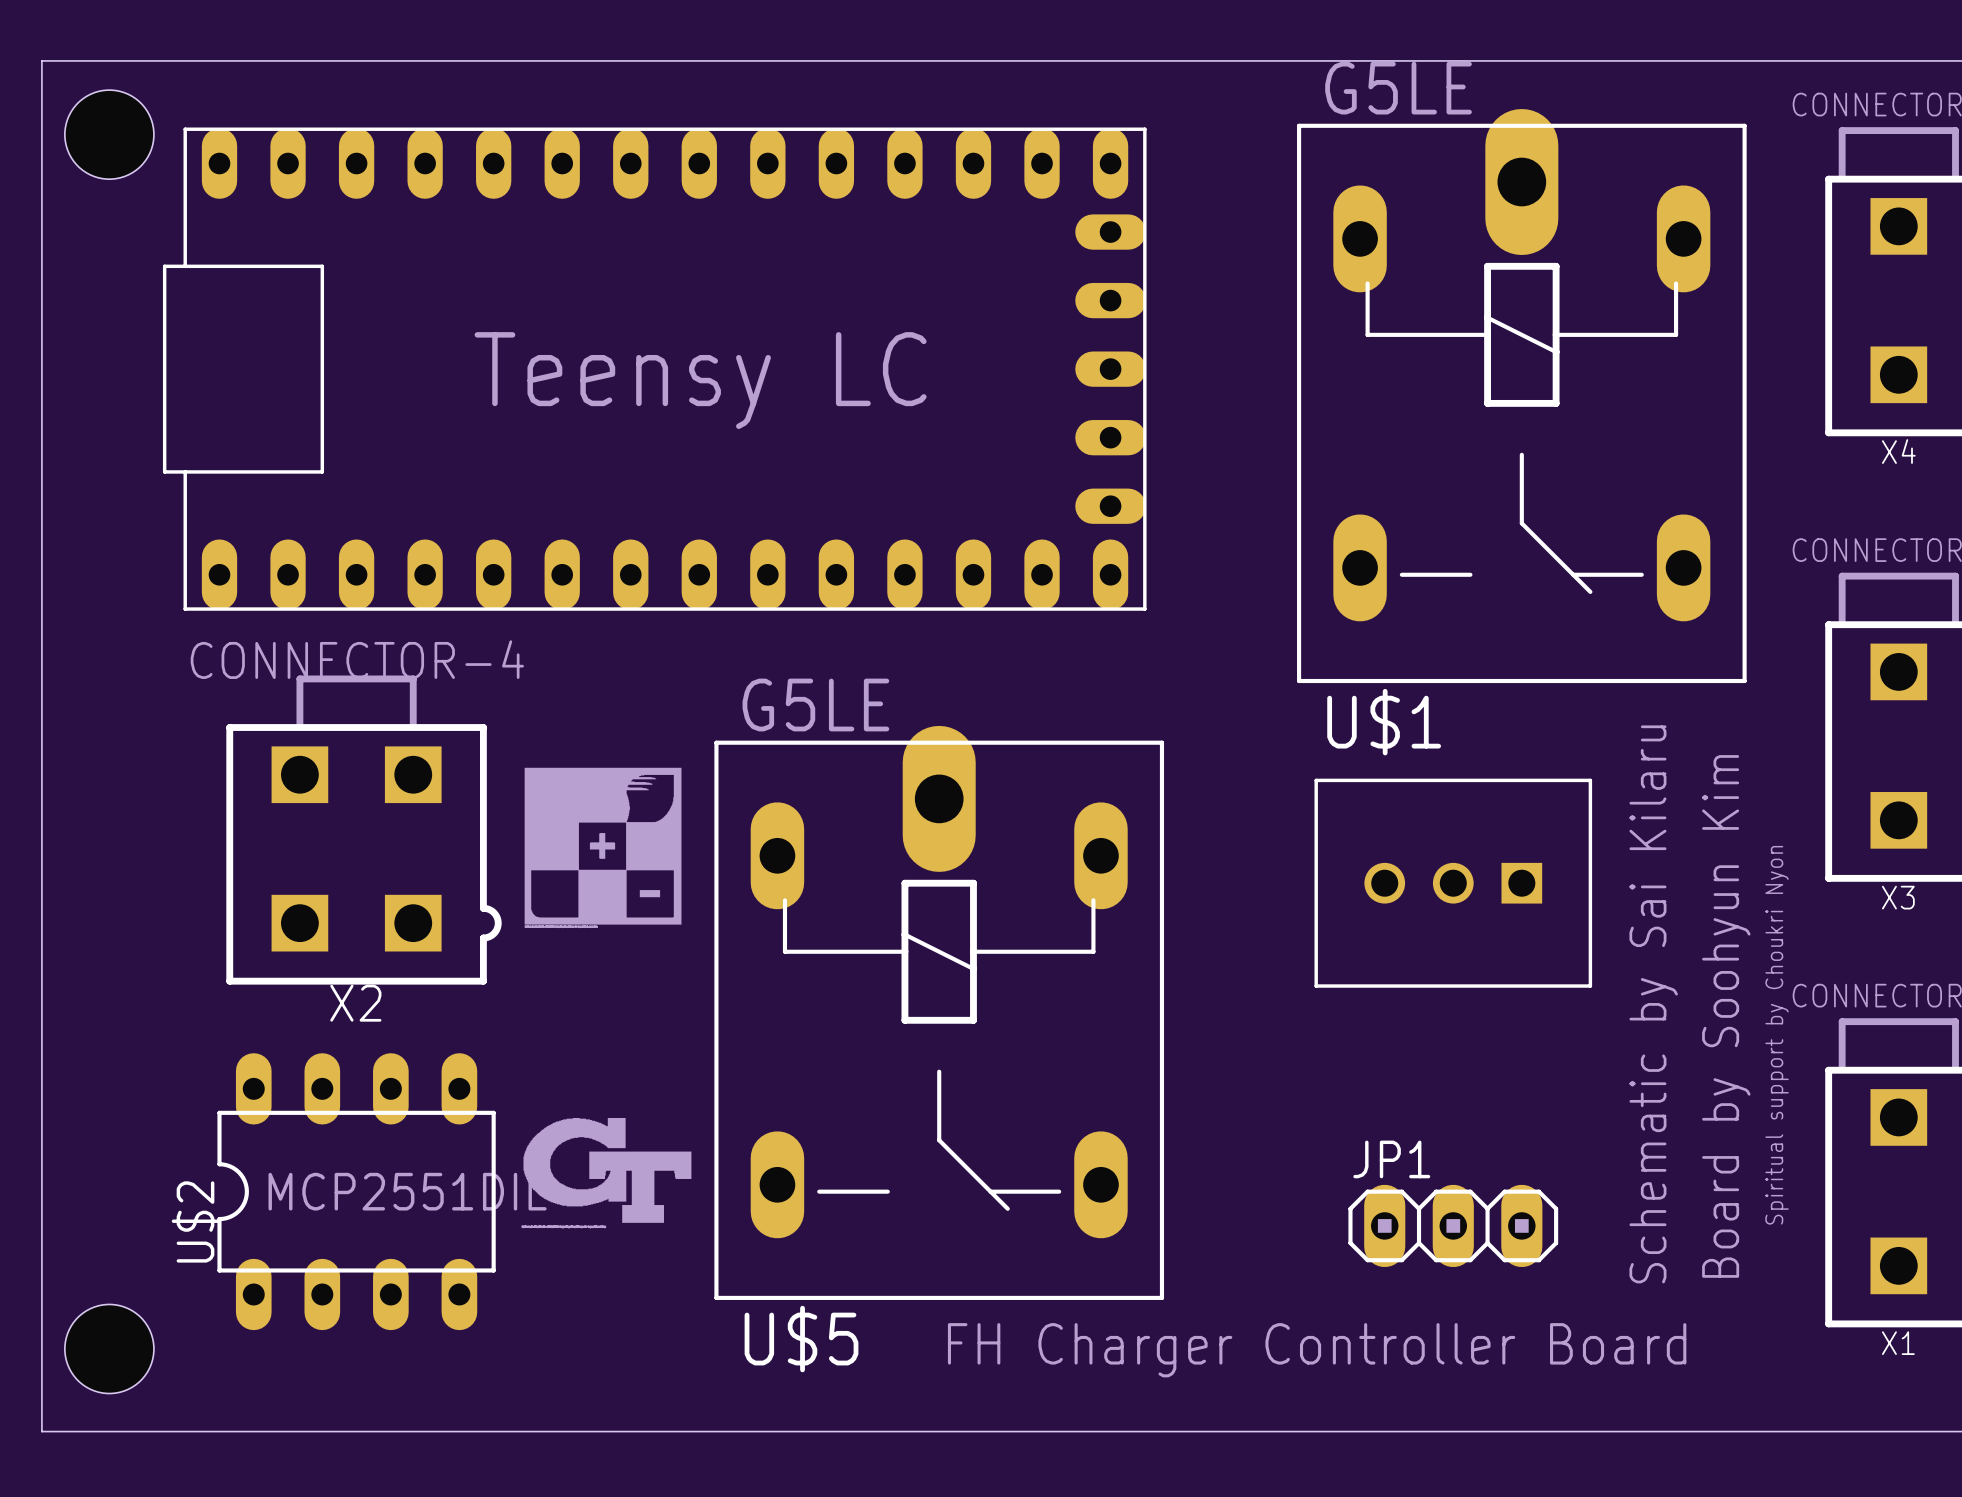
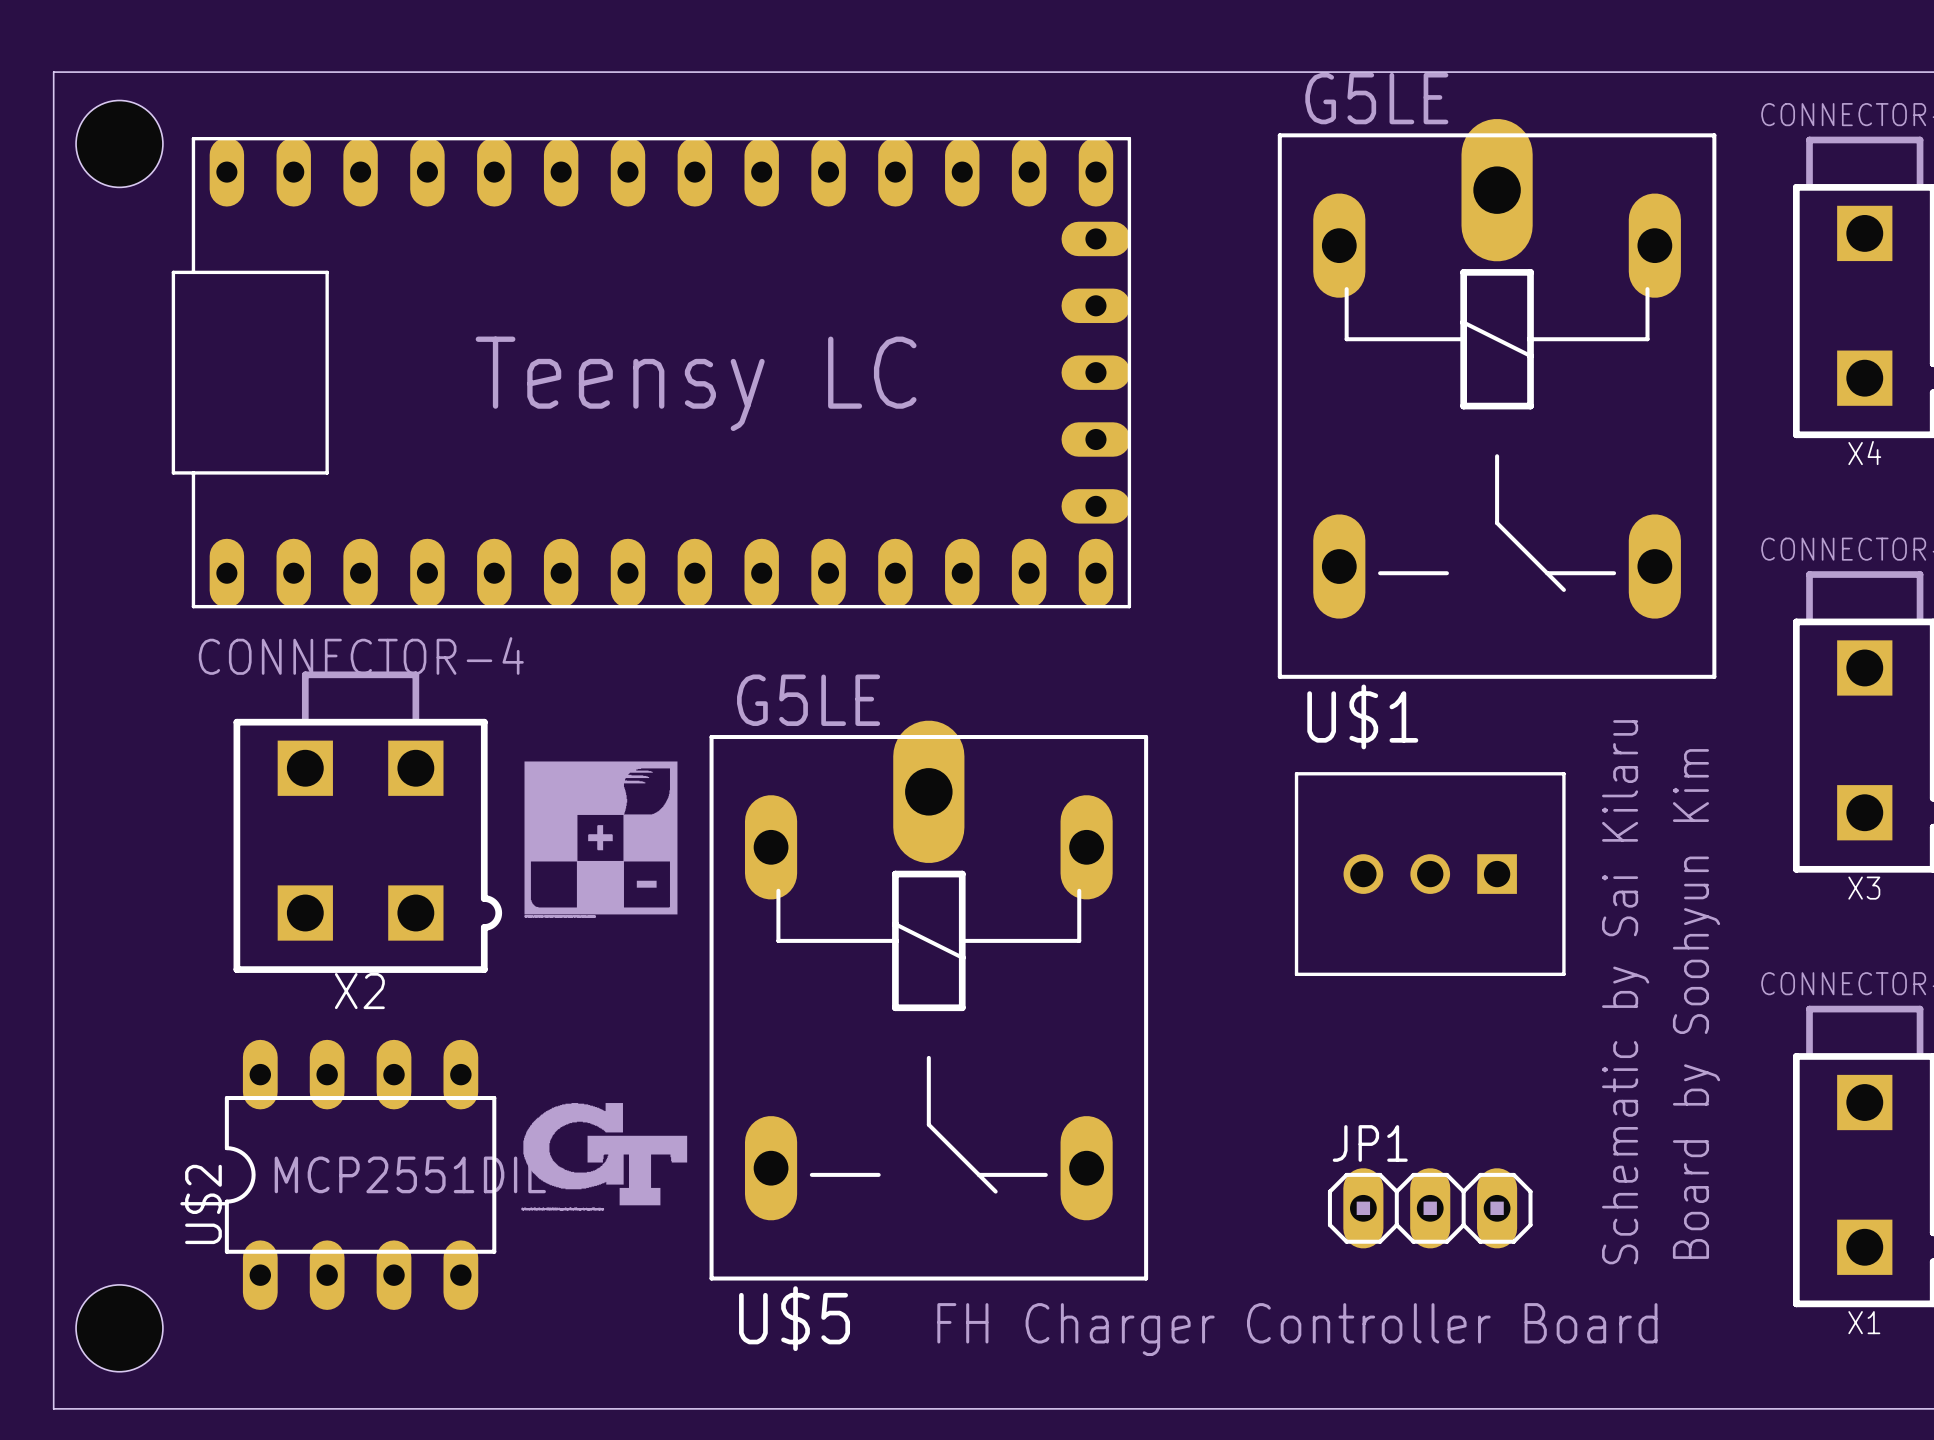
text: Spiritual support by Choukri Nyon (1777, 1035) -> none

